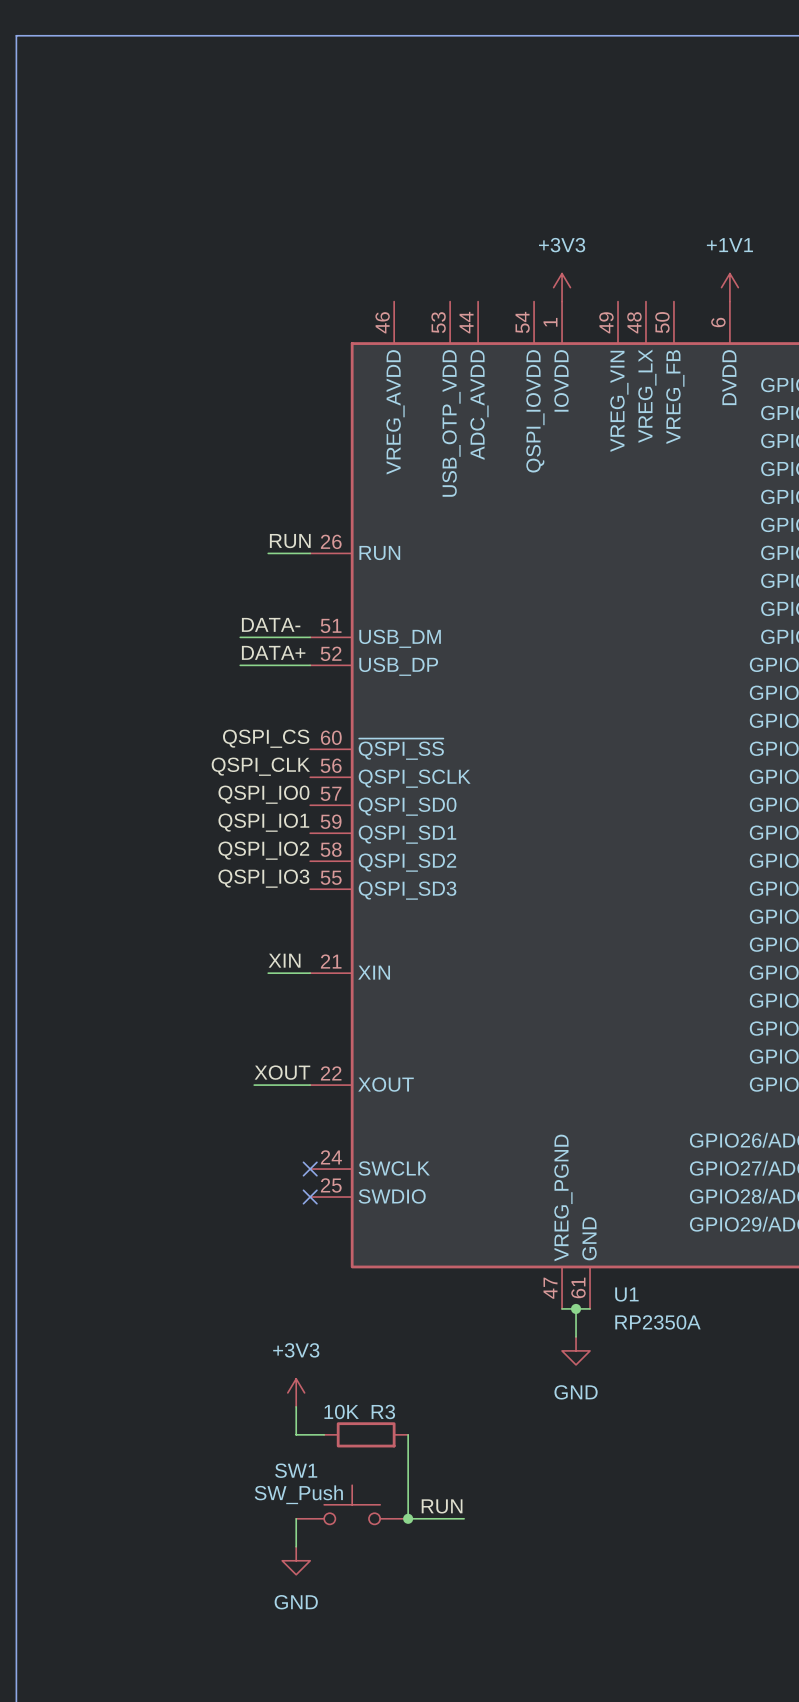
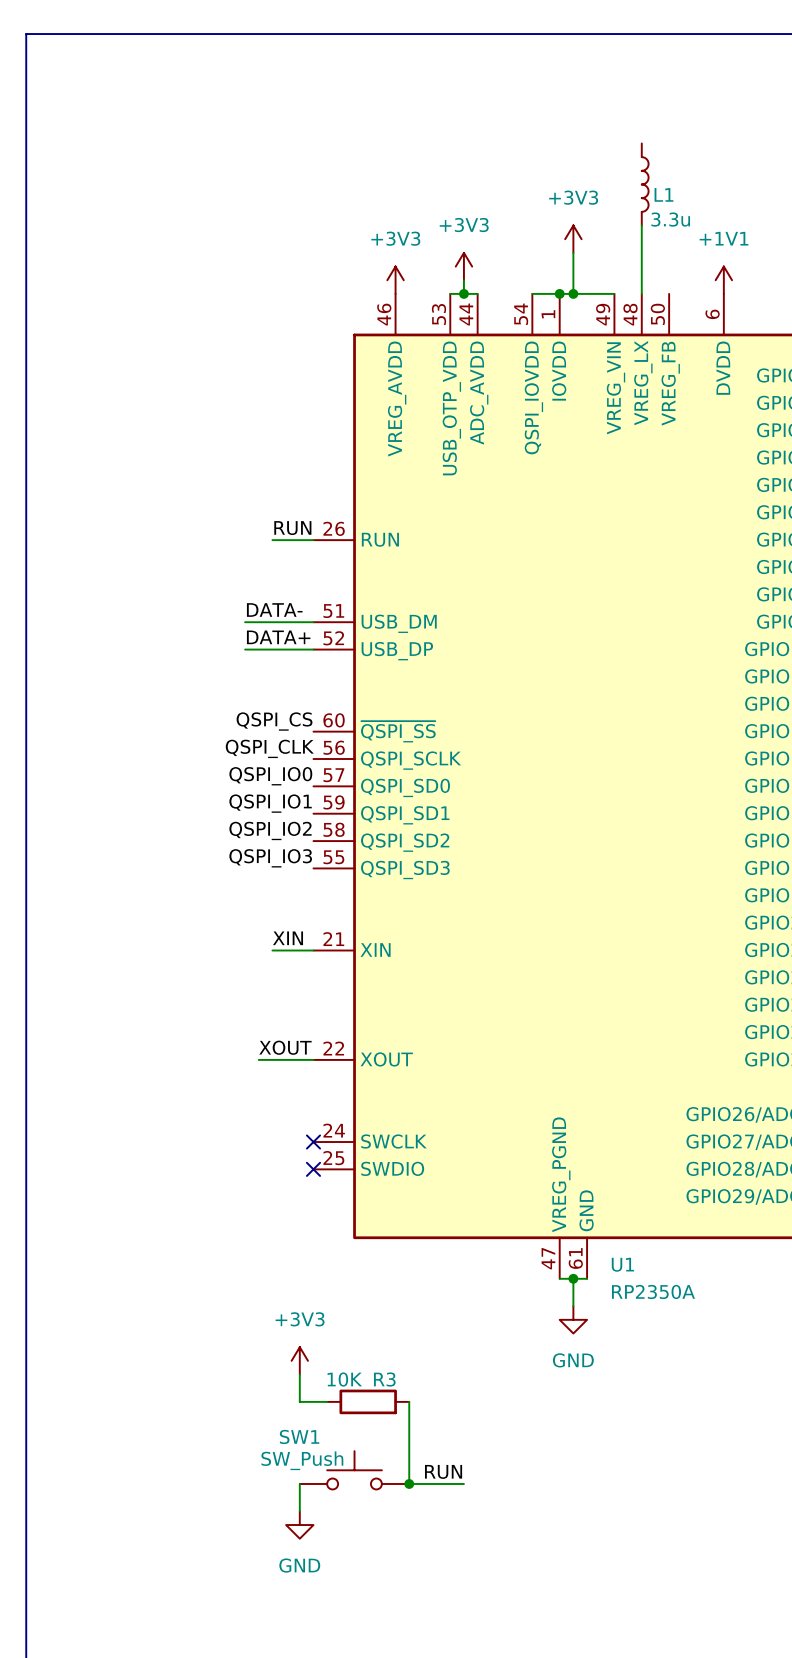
L1: none -> 3.3u (645, 184)
wire: none -> (641, 225) (641, 293)
wire: none -> (573, 252) (573, 293)
power symbol: none -> +3V3 (463, 266)
power symbol: none -> +3V3 (395, 280)
wire: none -> (463, 280) (463, 293)
power symbol position: +3V3 (562, 287) -> +3V3 (573, 239)
wire: none -> (450, 293) (477, 293)
junction: none -> (463, 293)
wire: none -> (532, 293) (614, 293)
junction: none -> (559, 293)
junction: none -> (573, 293)

